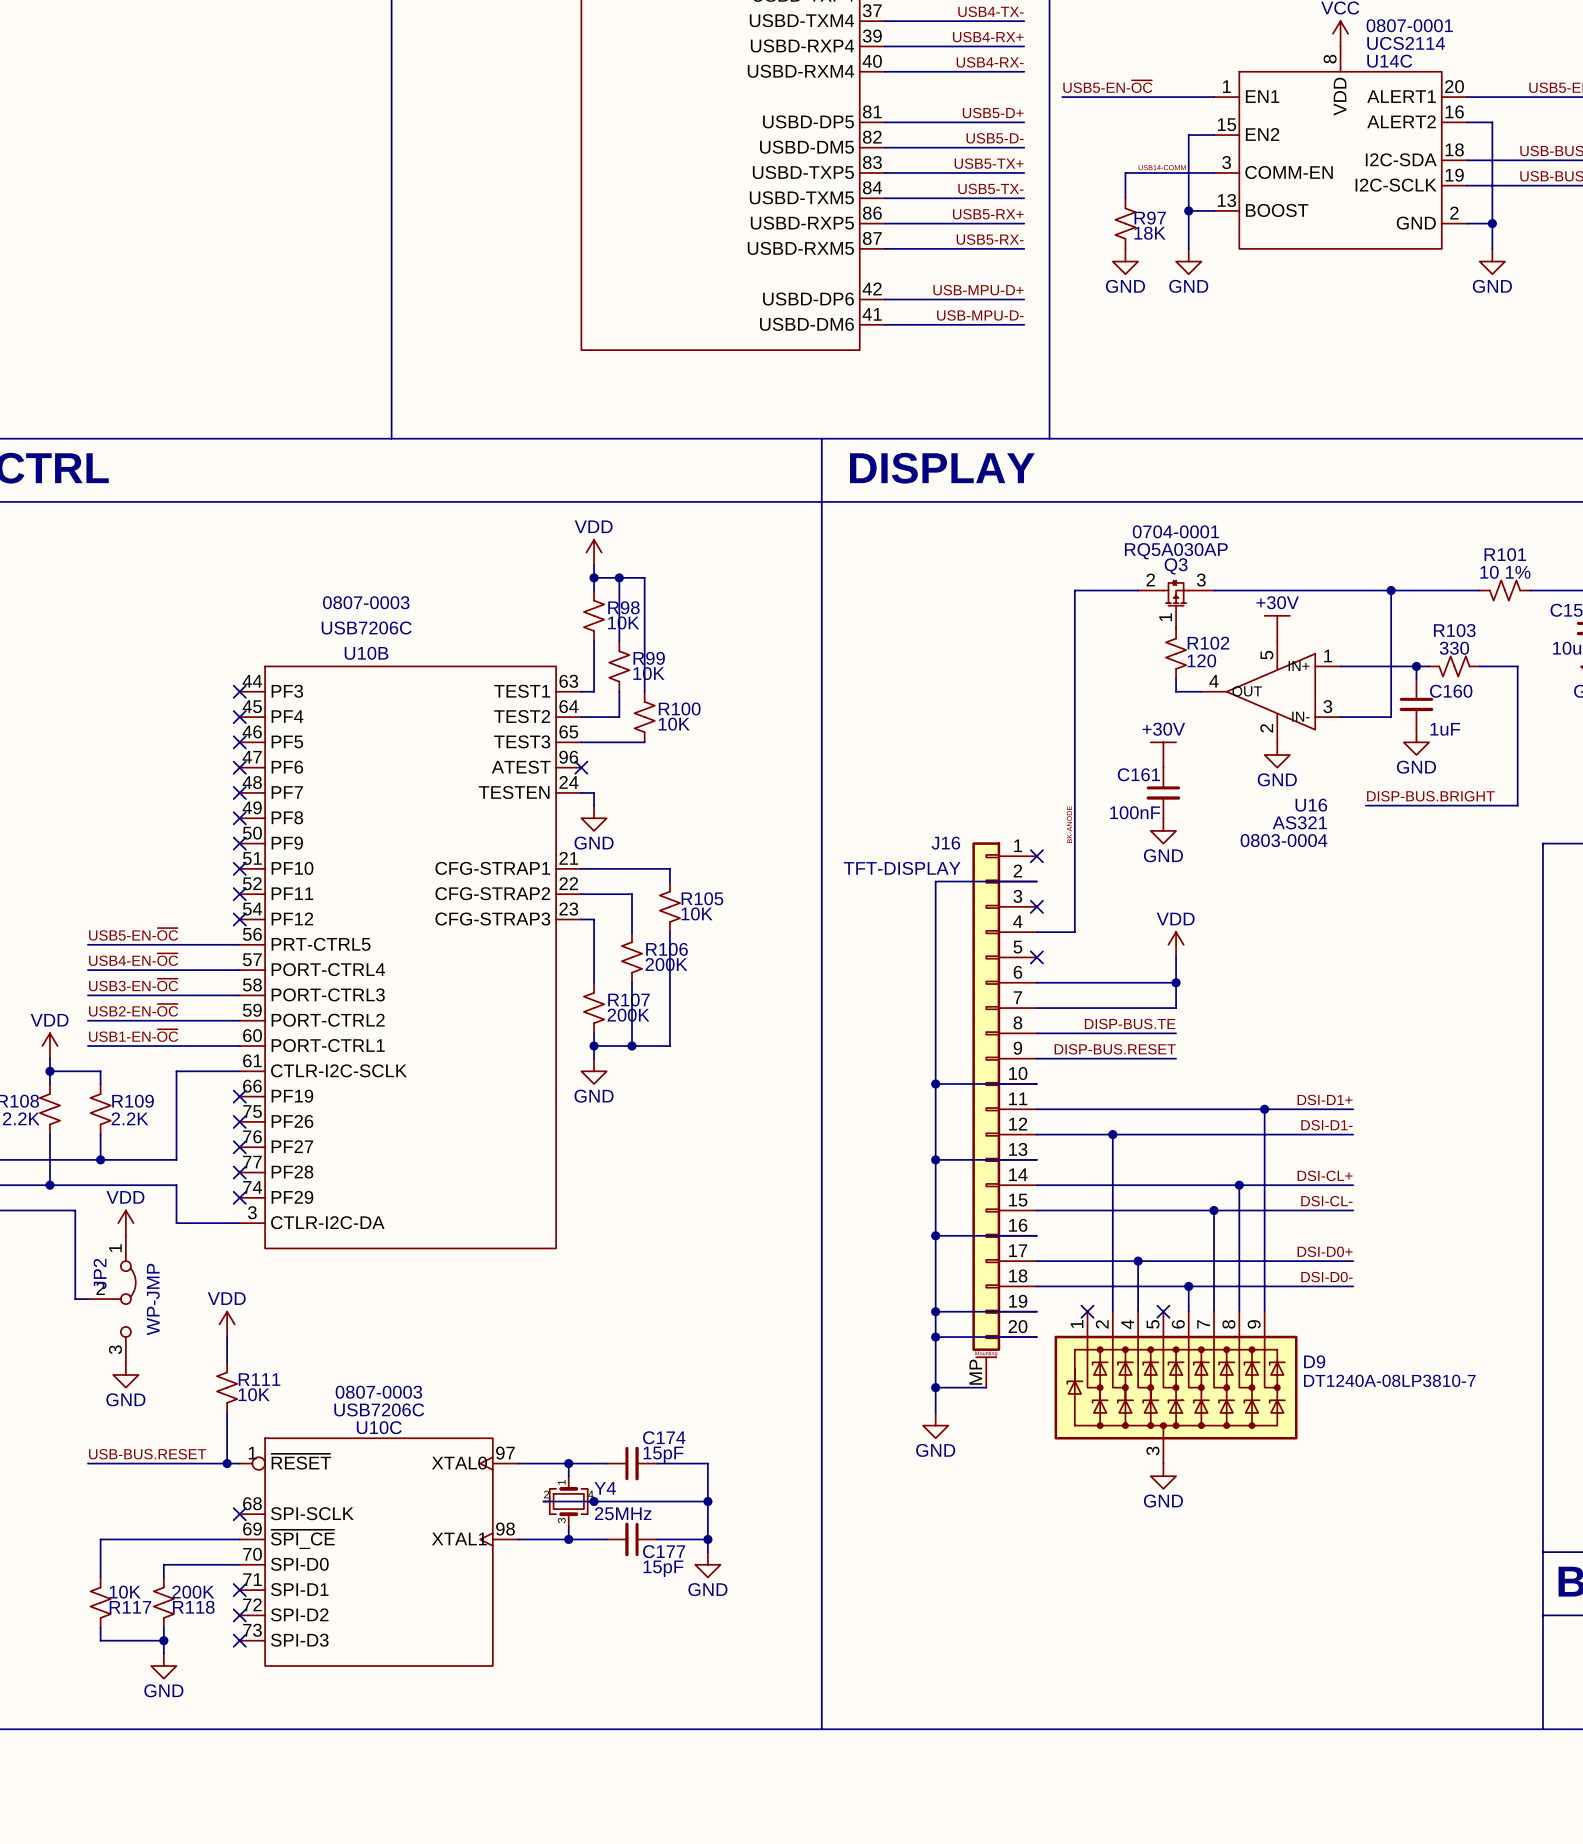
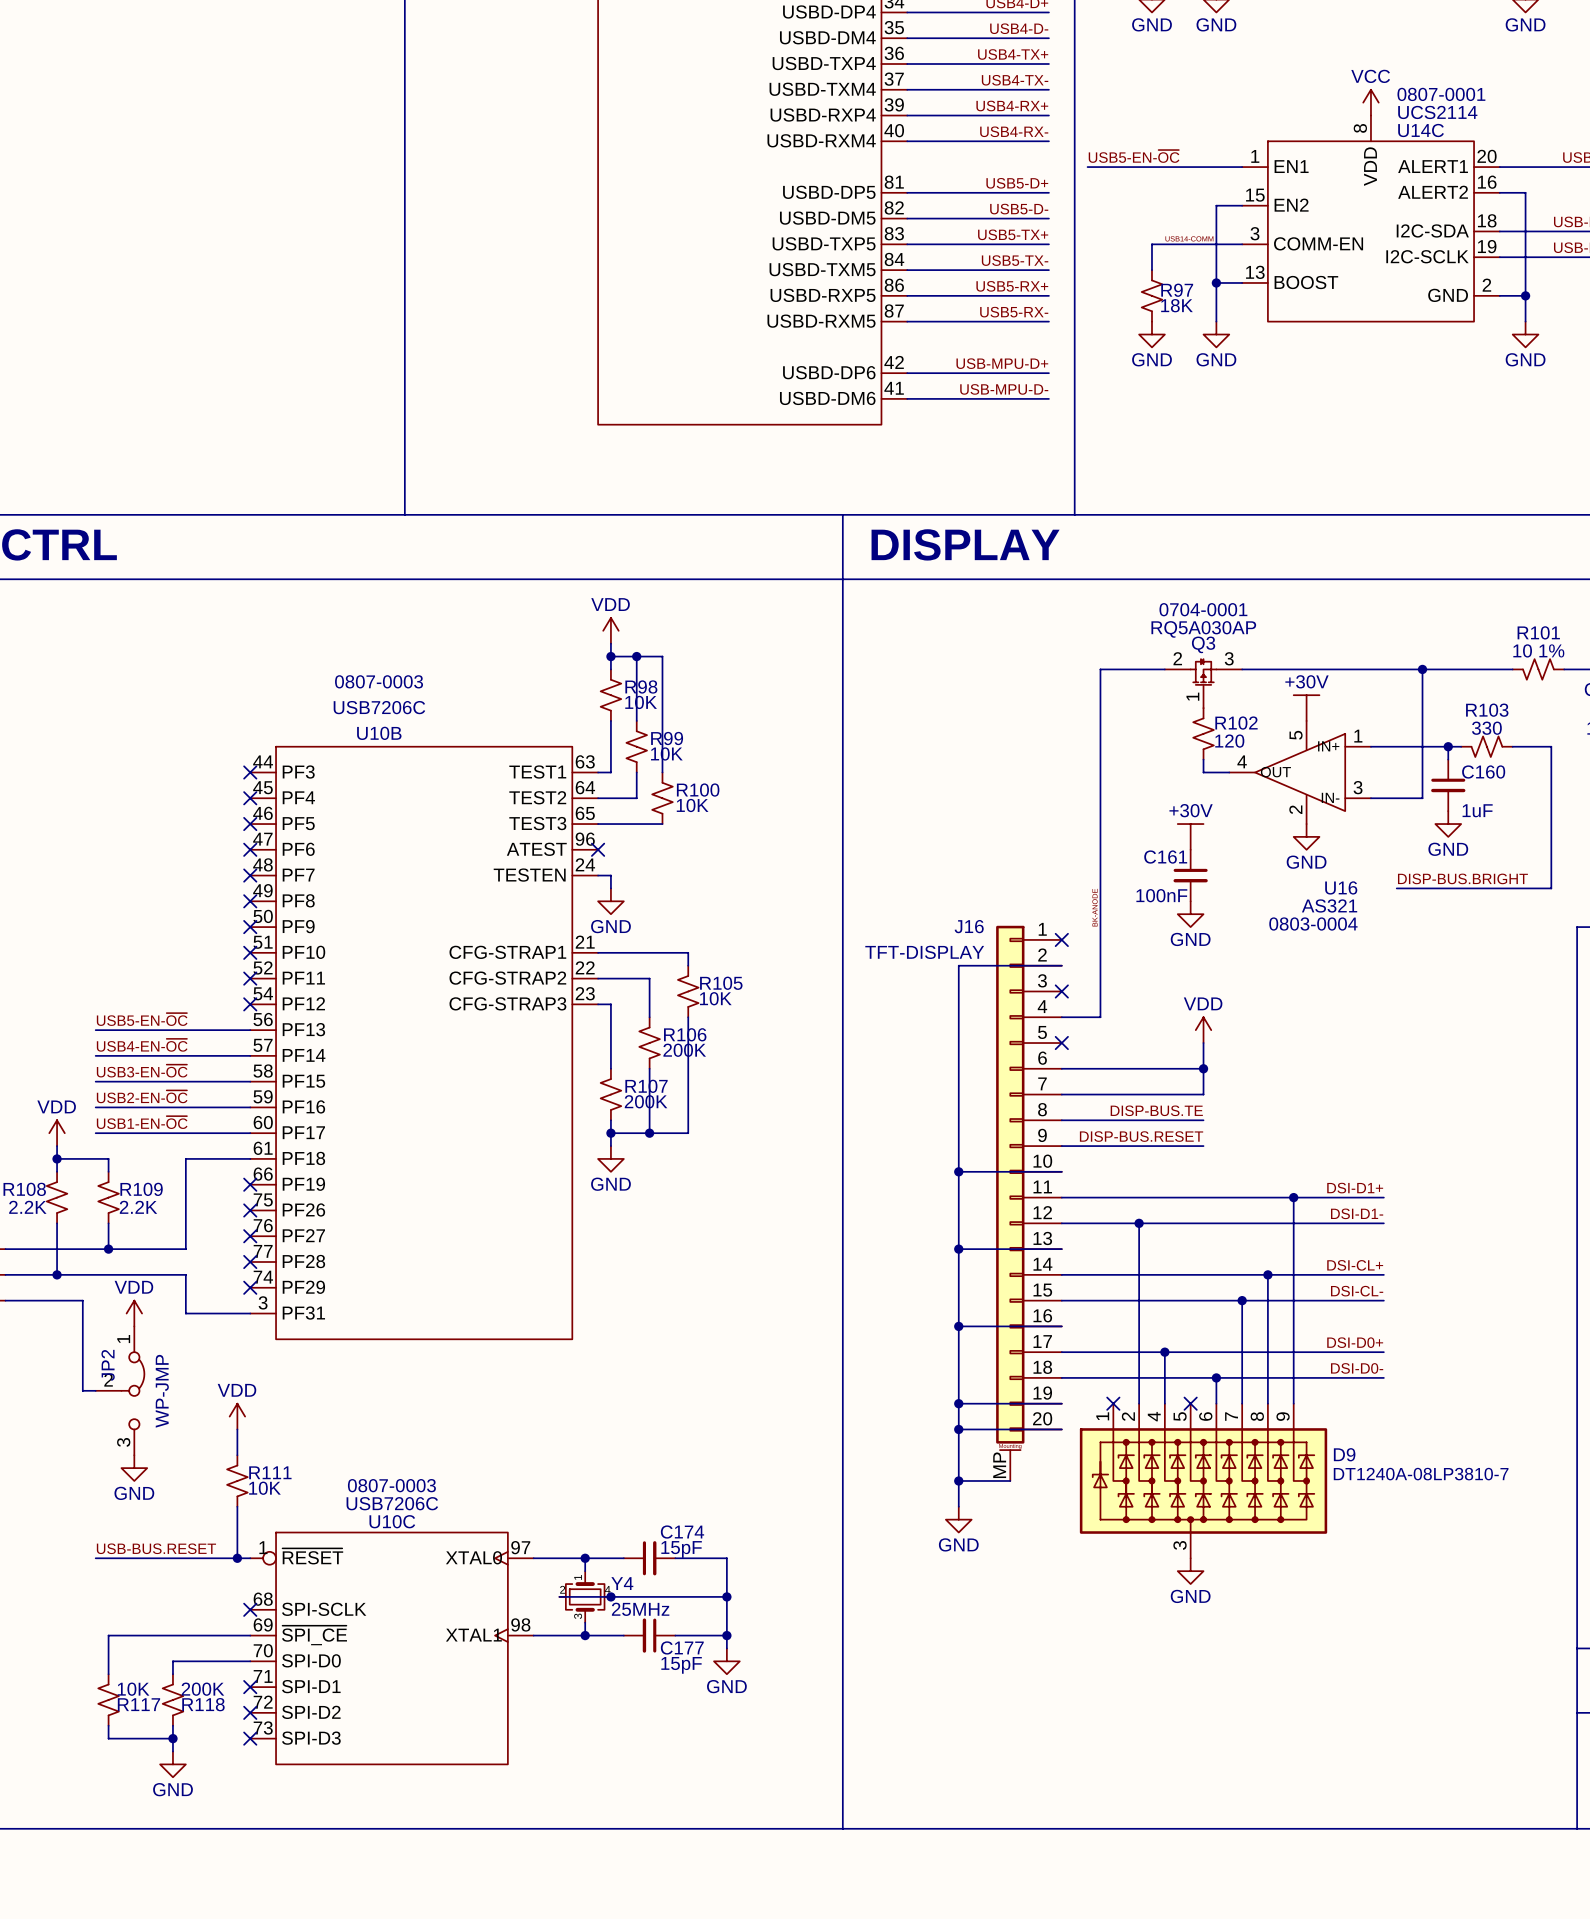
U10B pin name: PRT-CTRL5 (321, 944) -> PF13 (303, 1029)
U10B pin name: PORT-CTRL4 (328, 969) -> PF14 (304, 1055)
U10B pin name: PORT-CTRL3 (328, 994) -> PF15 (303, 1081)
U10B pin name: PORT-CTRL2 (328, 1020) -> PF16 (303, 1106)
U10B pin name: PORT-CTRL1 (328, 1045) -> PF17 (303, 1132)
U10B pin name: CTLR-I2C-SCLK (338, 1070) -> PF18 (303, 1158)
U10B pin name: CTLR-I2C-DA (327, 1222) -> PF31 (303, 1313)

